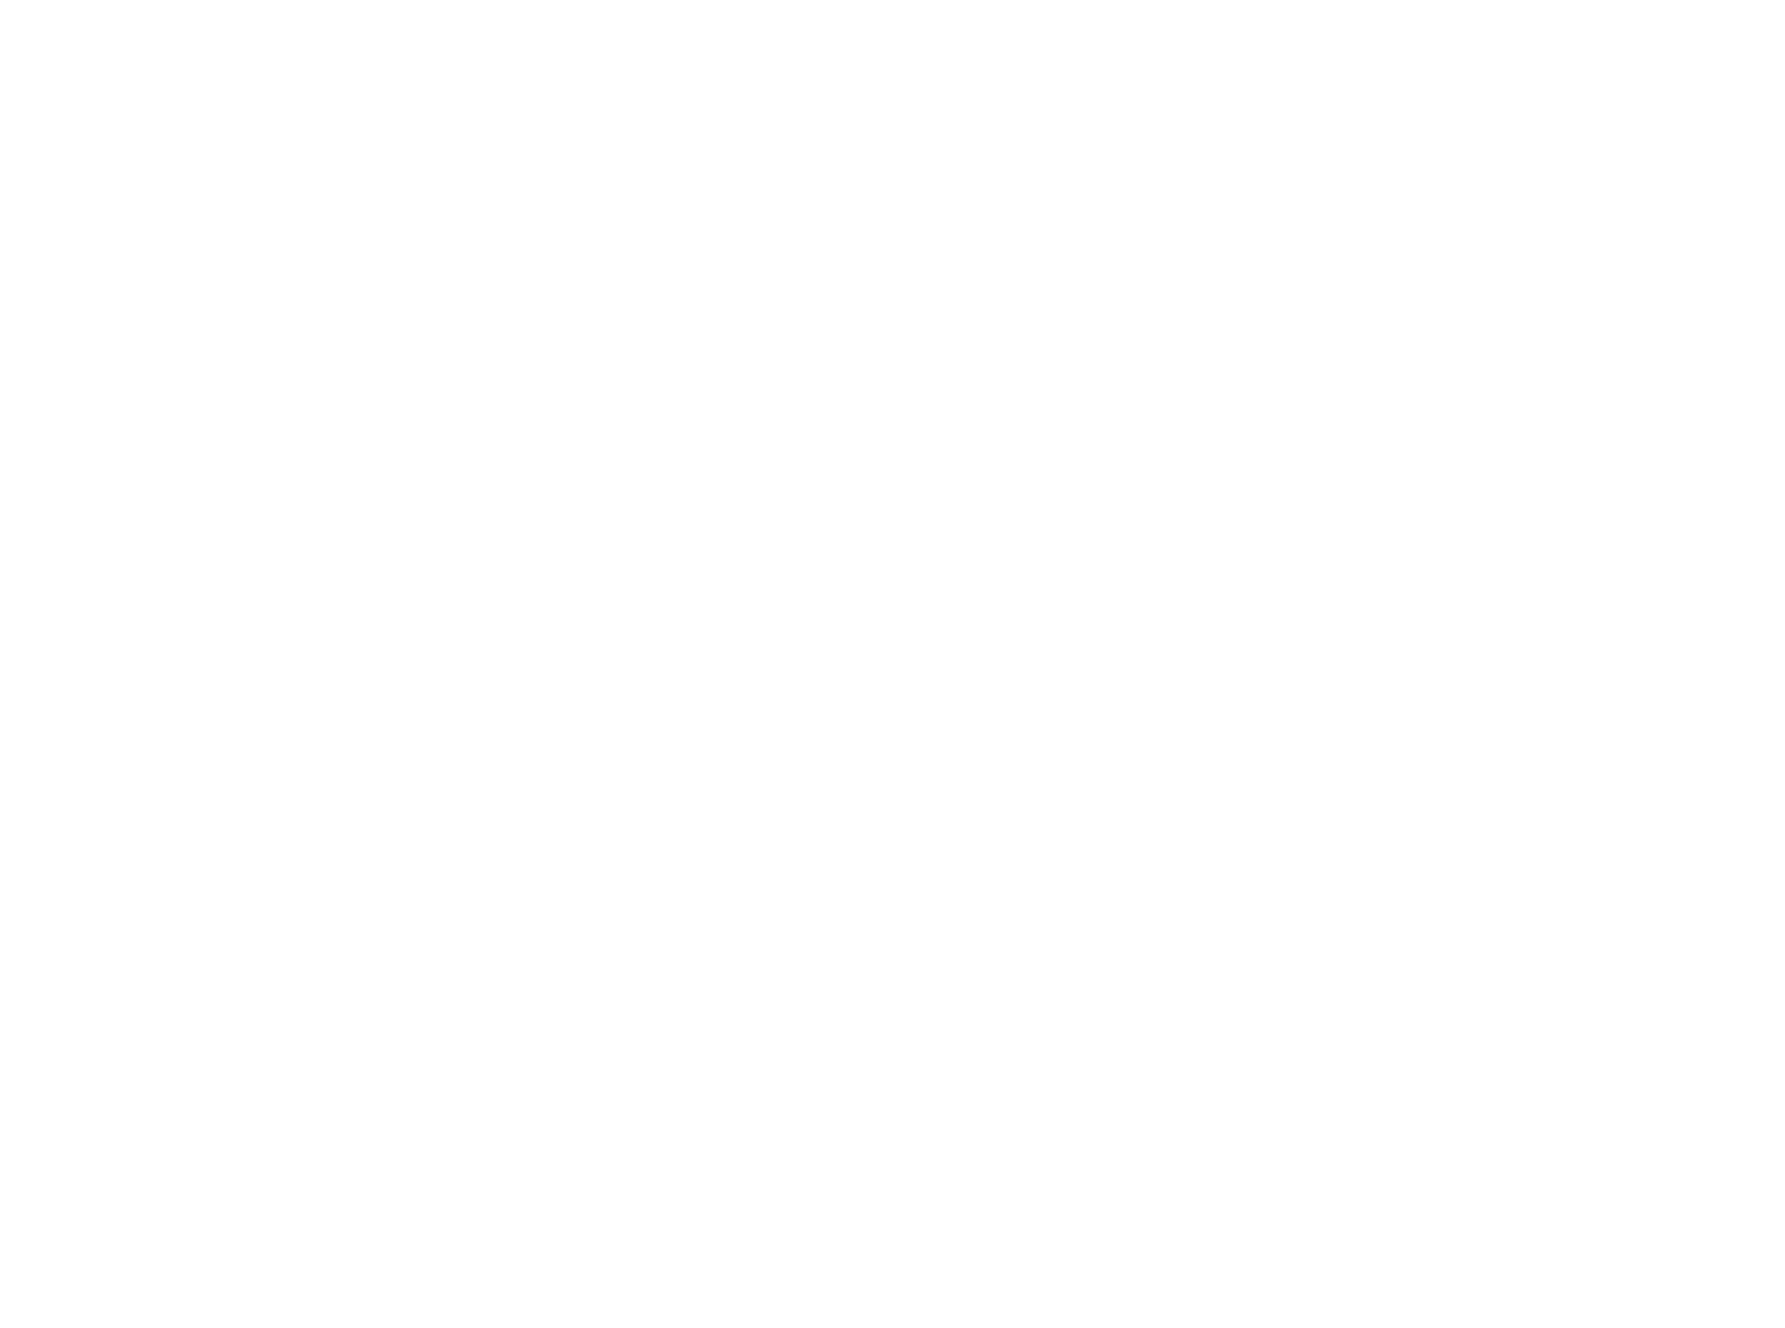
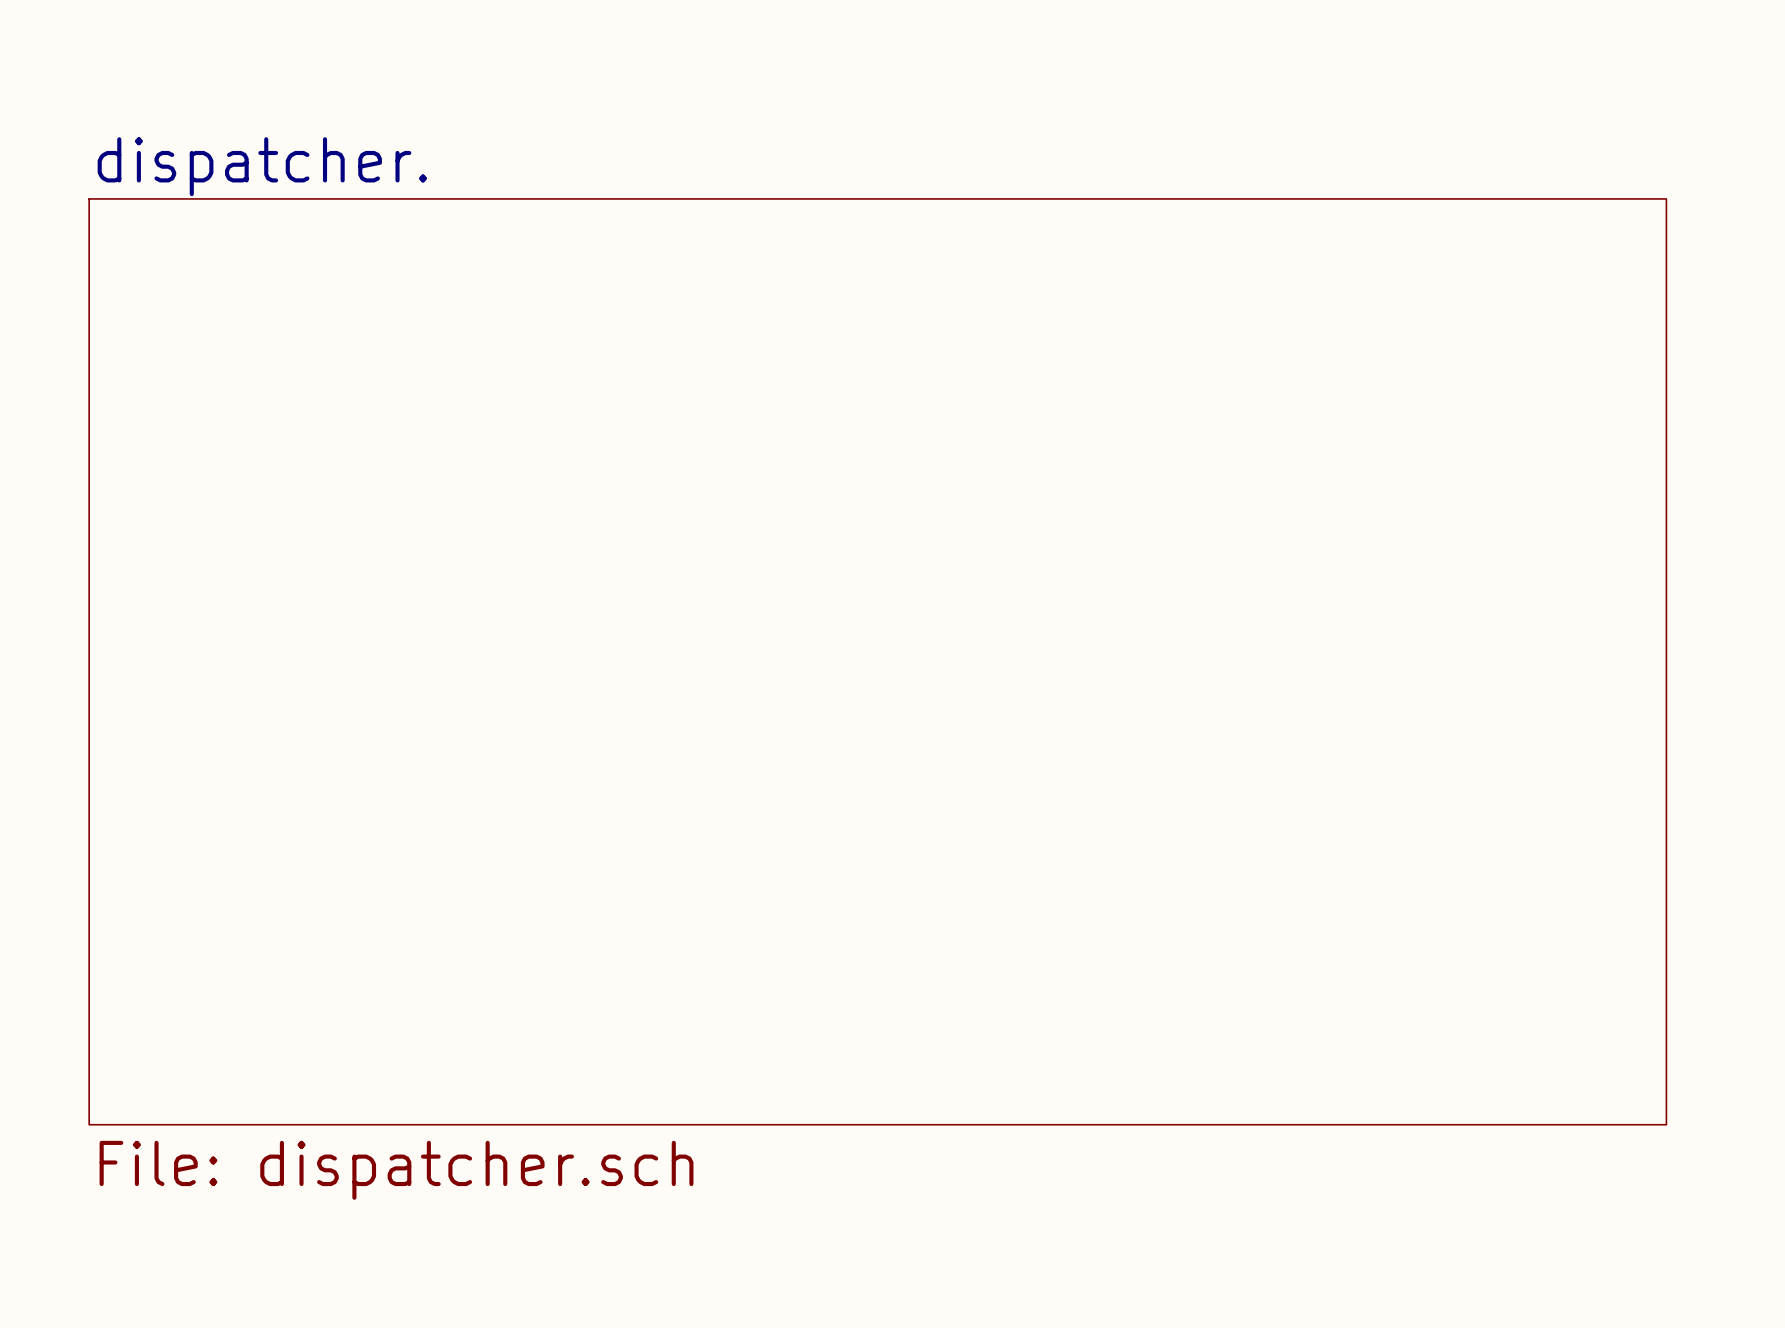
sheet dispatcher.: none -> File: dispatcher.sch (877, 661)

